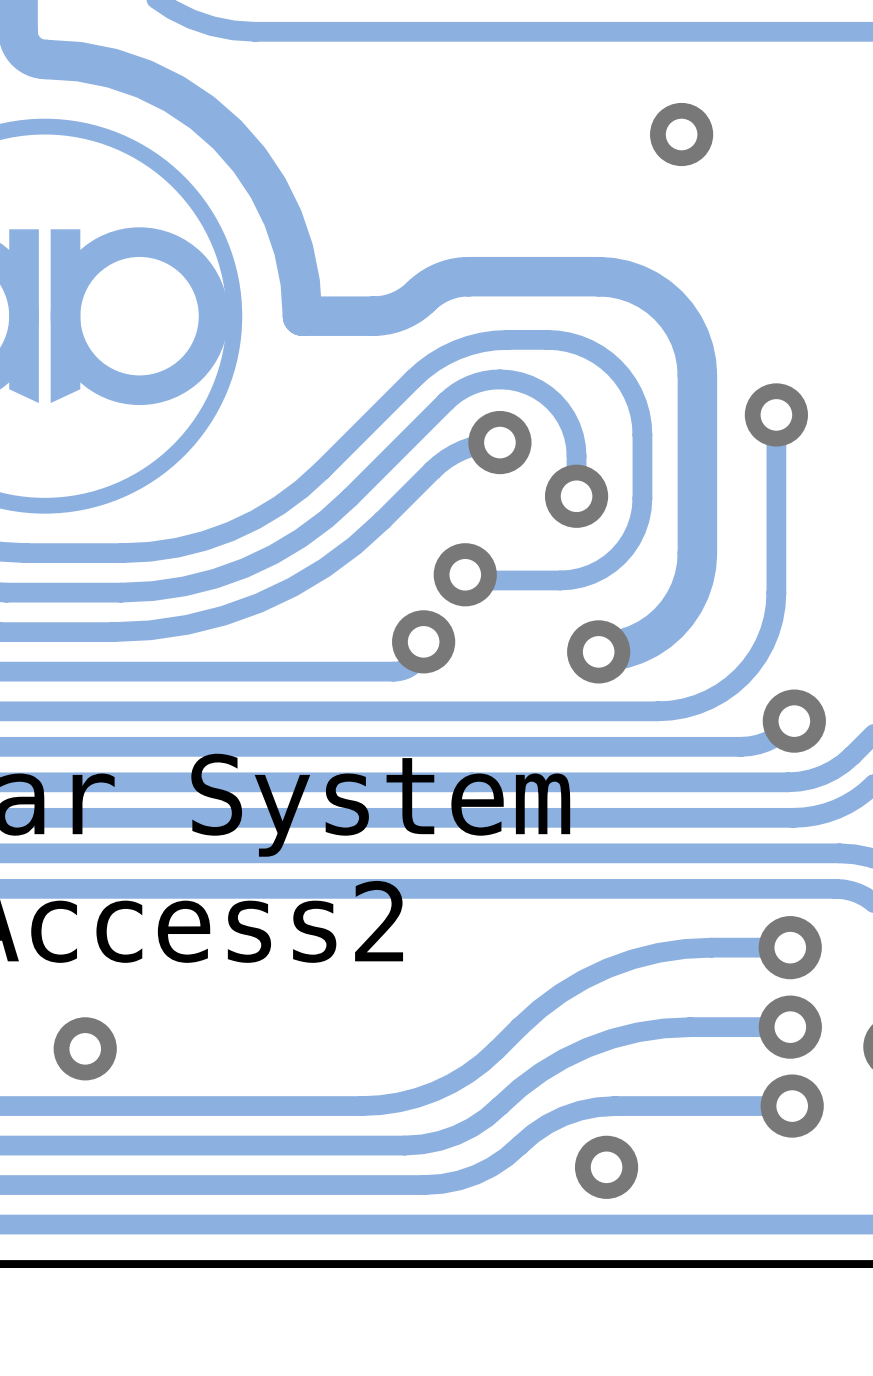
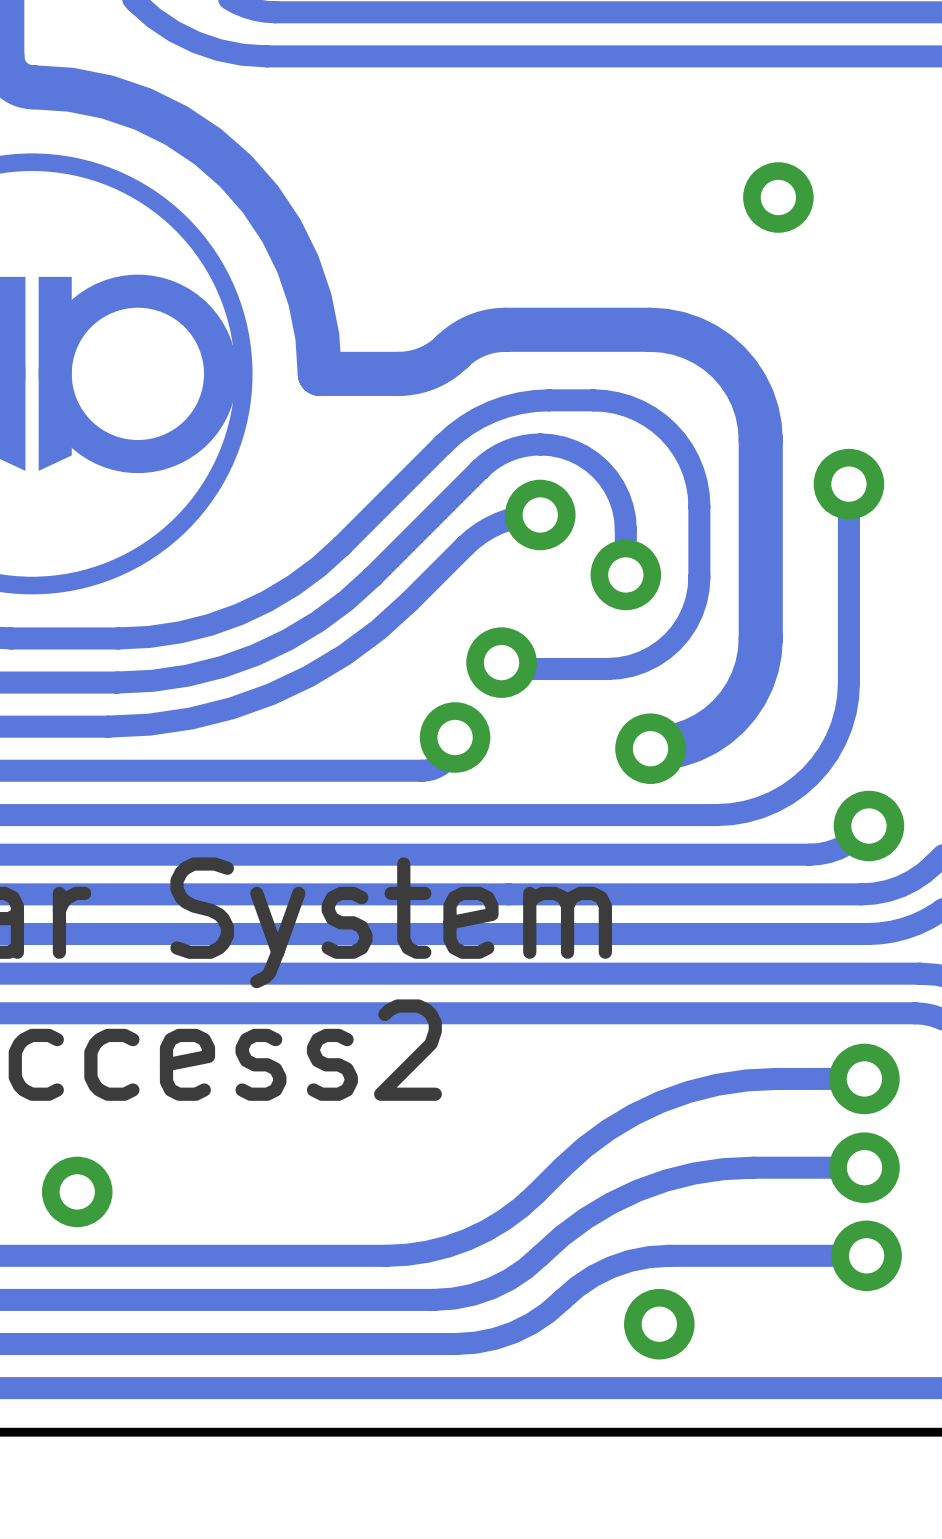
via position: (681, 134) -> (778, 197)

